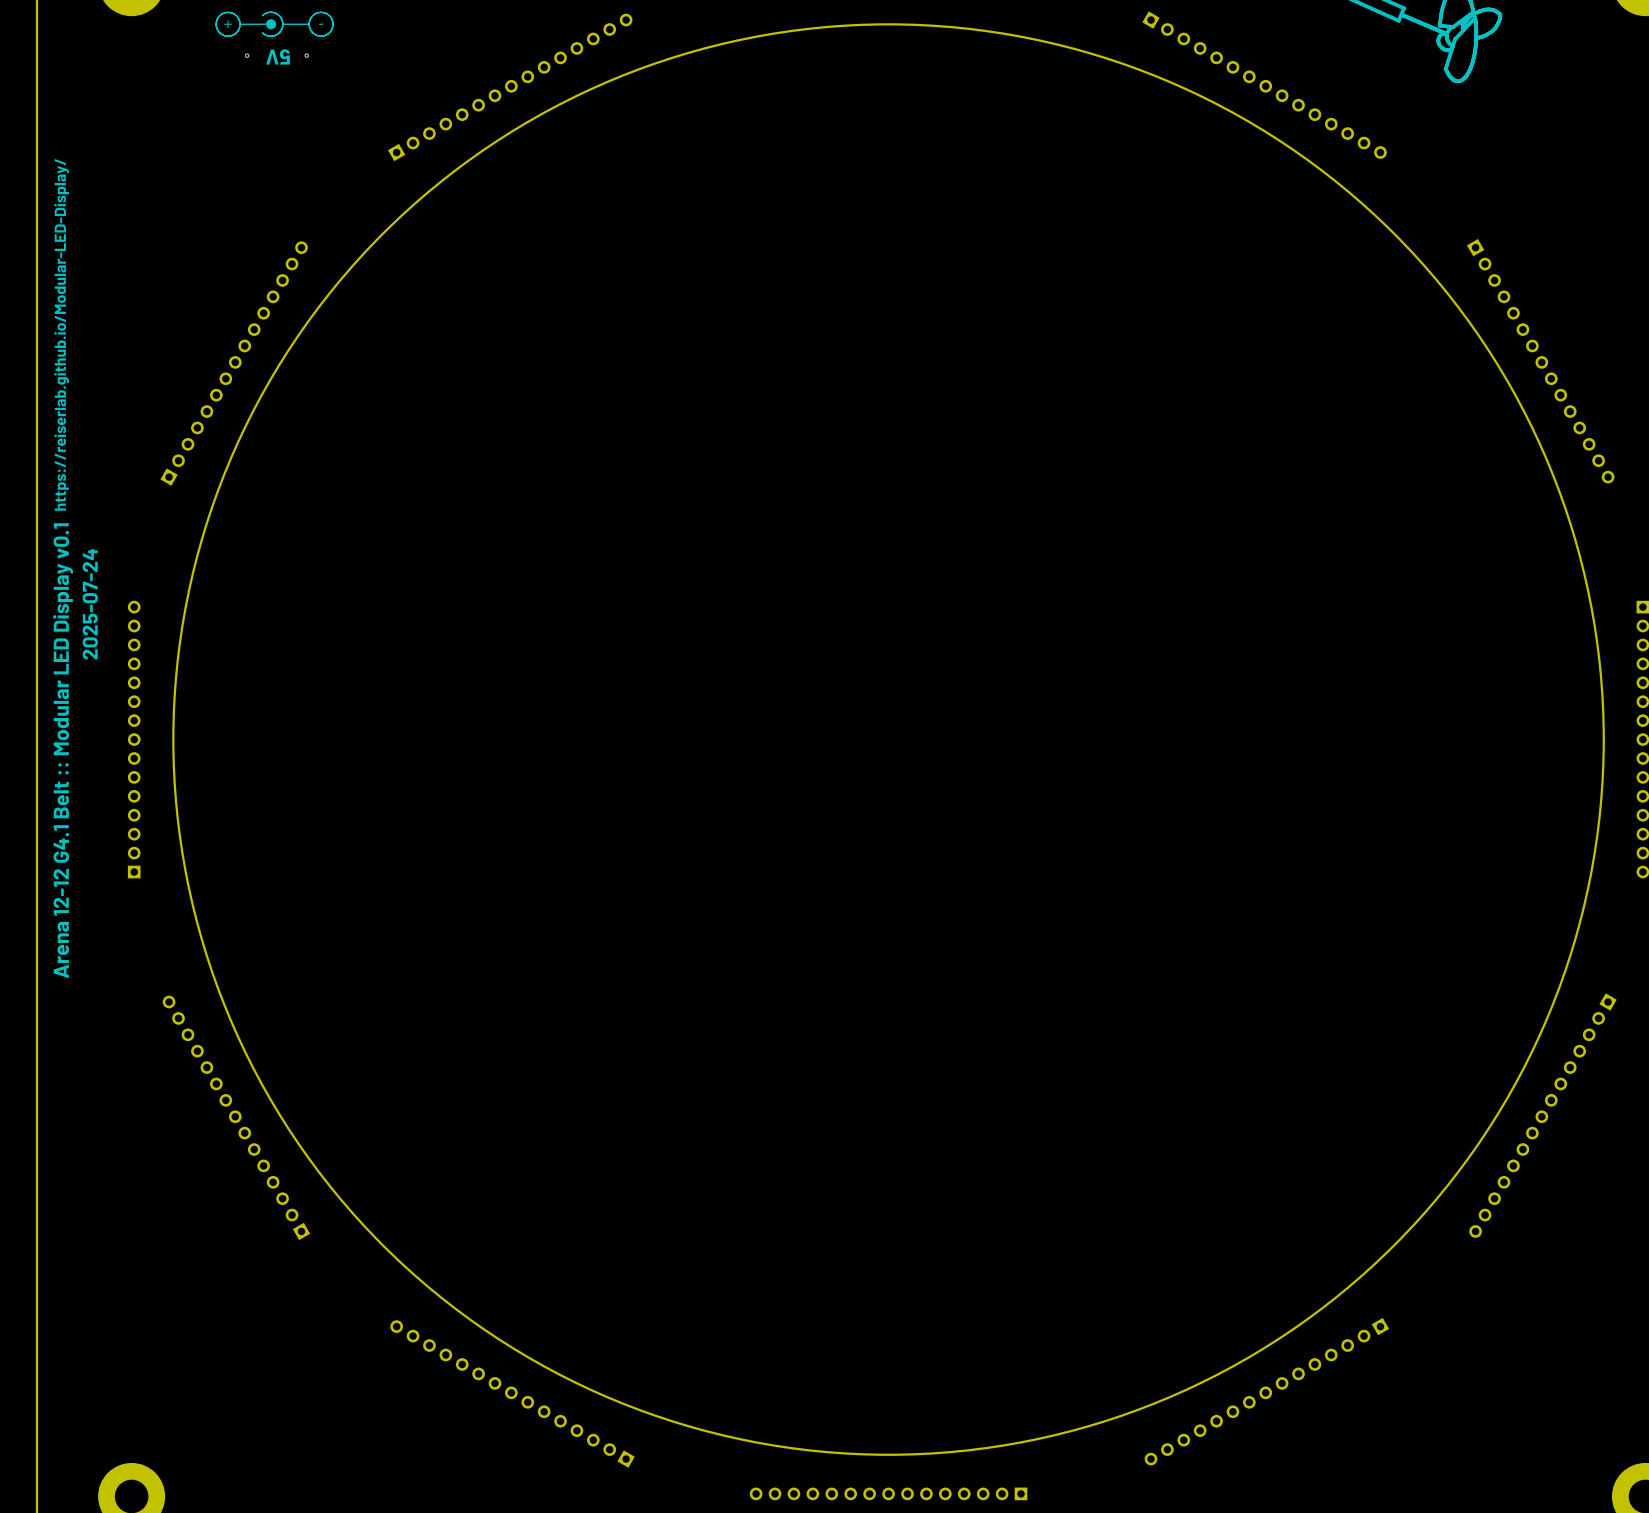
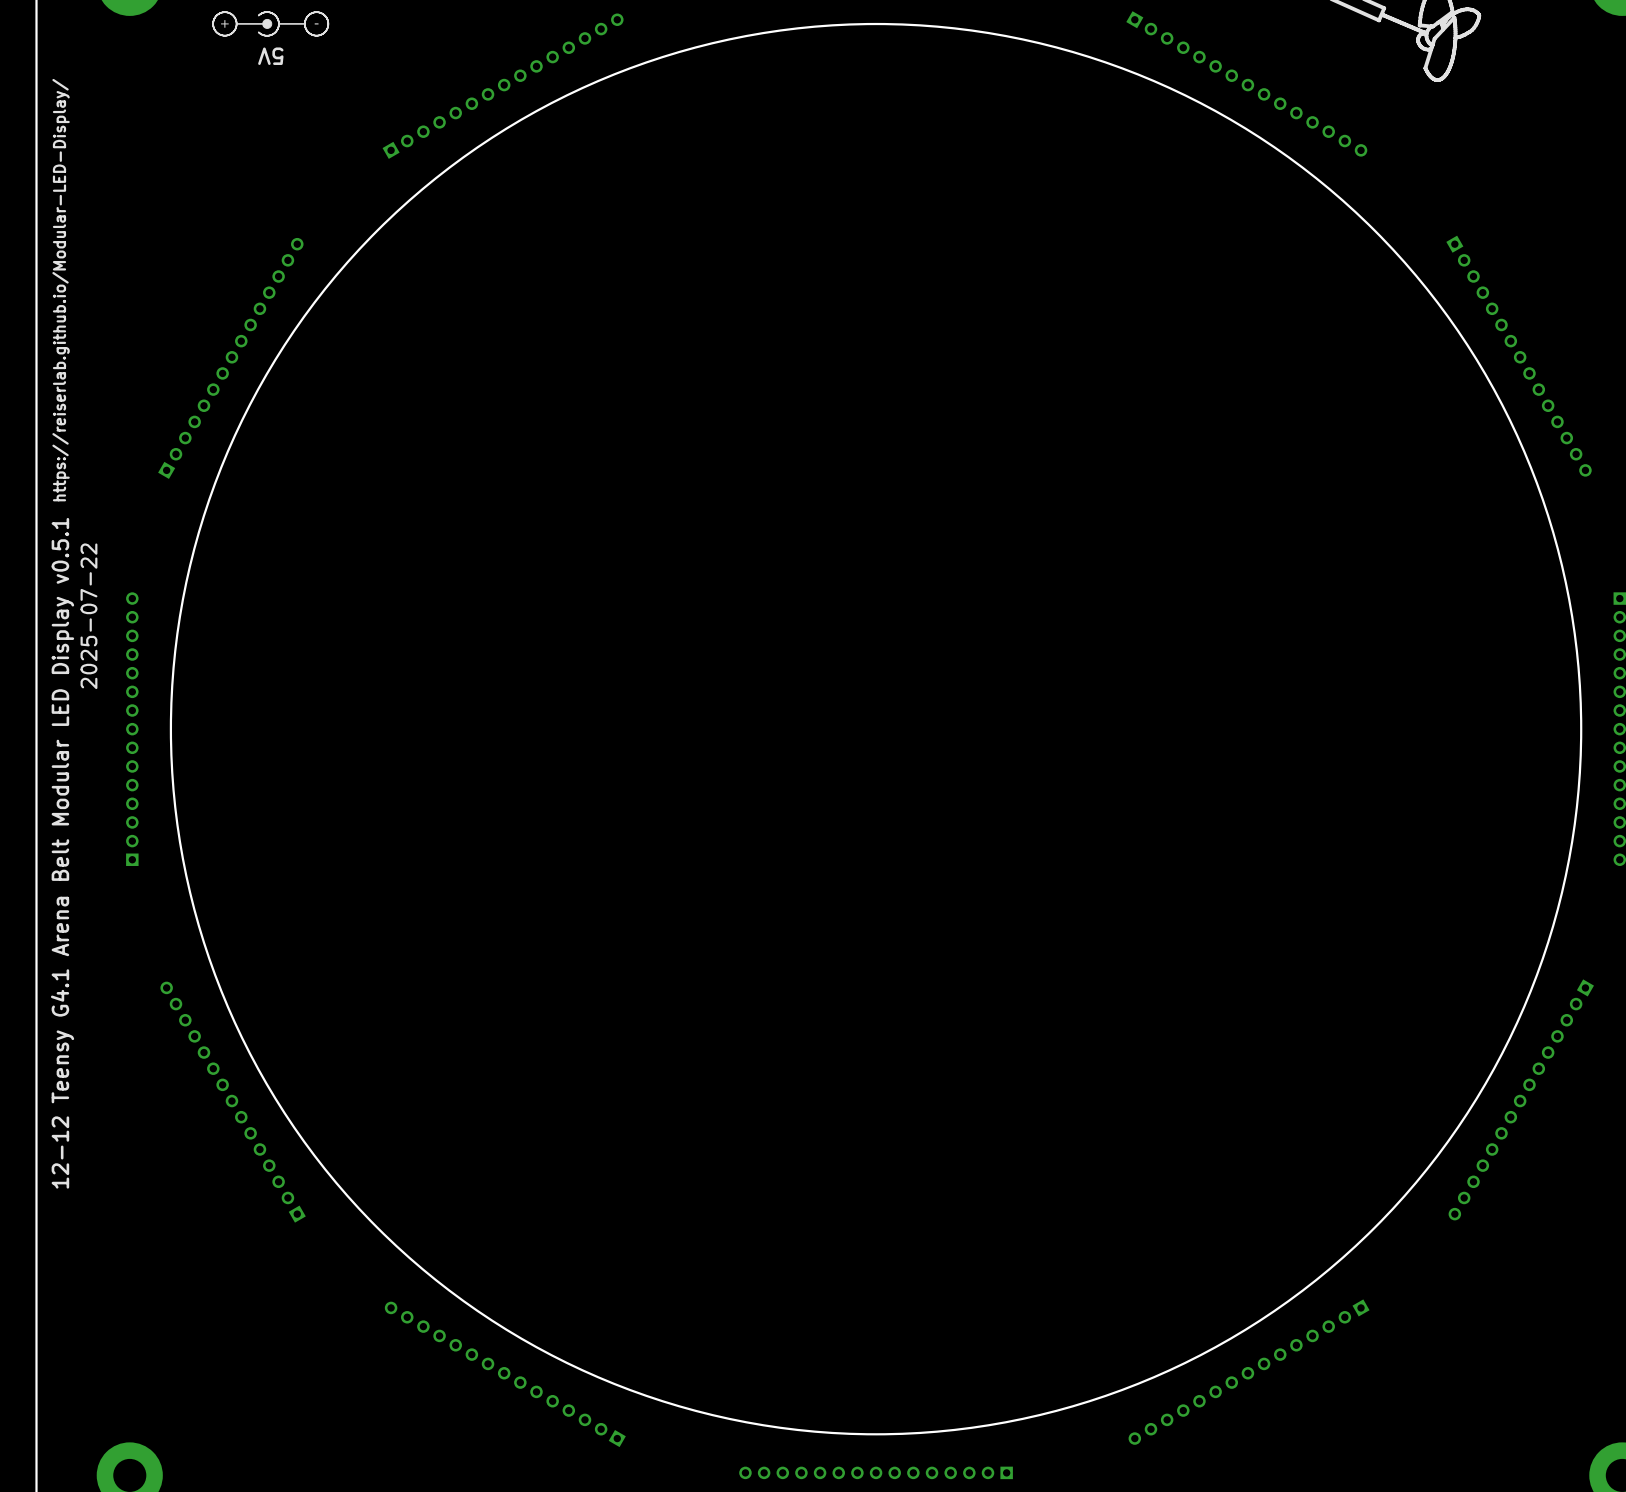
via: (247, 55) -> none
via: (306, 55) -> none
text: 2025-07-24 (90, 604) -> 2025-07-22 (88, 616)
text: Arena 12-12 G4.1 Belt :: Modular LED Display v0.1 (63, 750) -> 12-12 Teensy G4.1 Arena Belt Modular LED Display v0.5.1 (62, 853)

